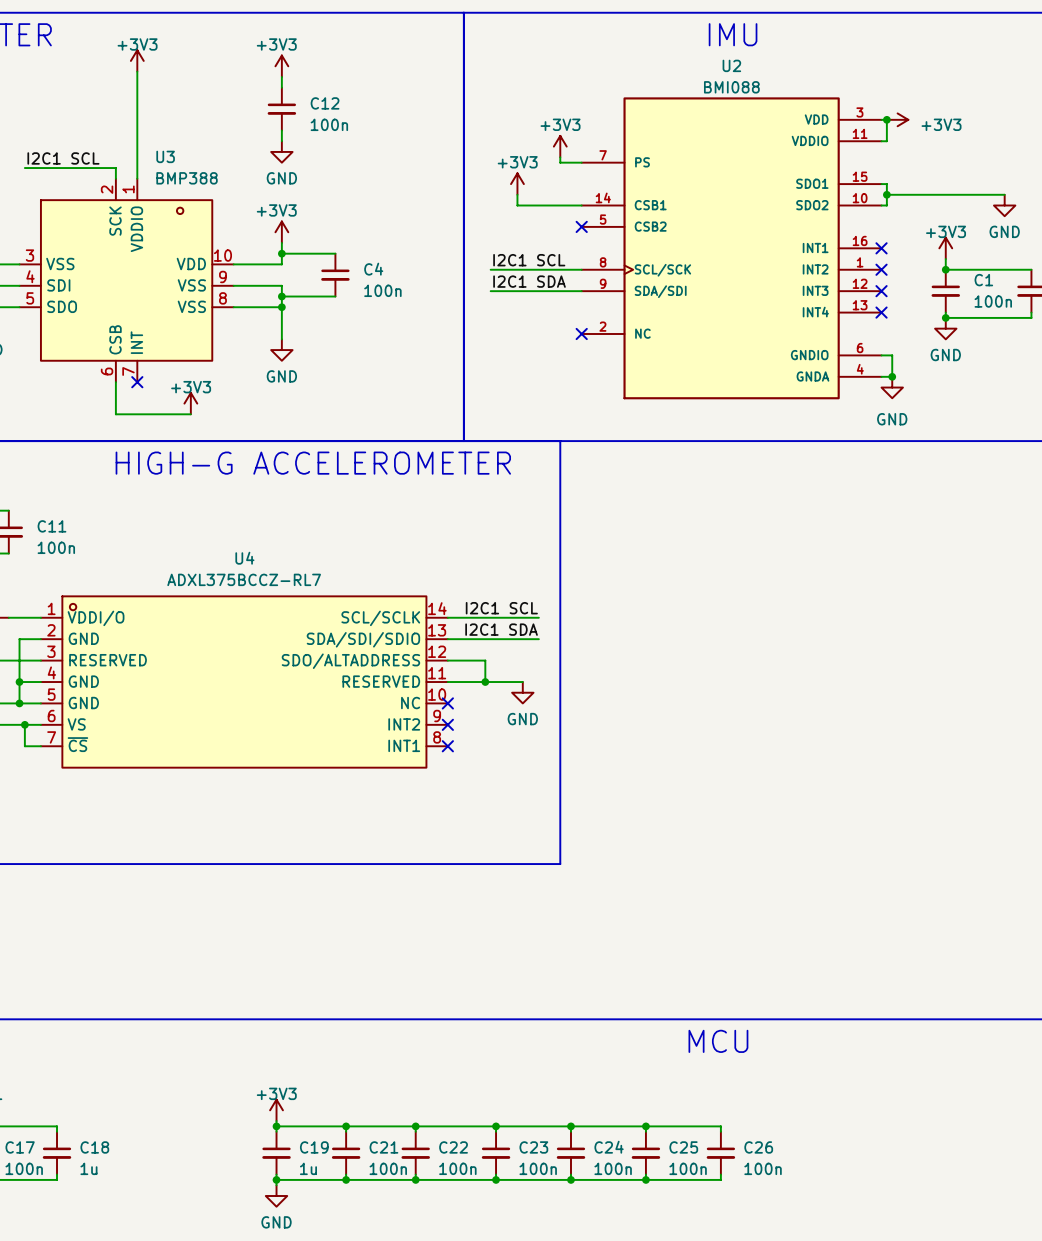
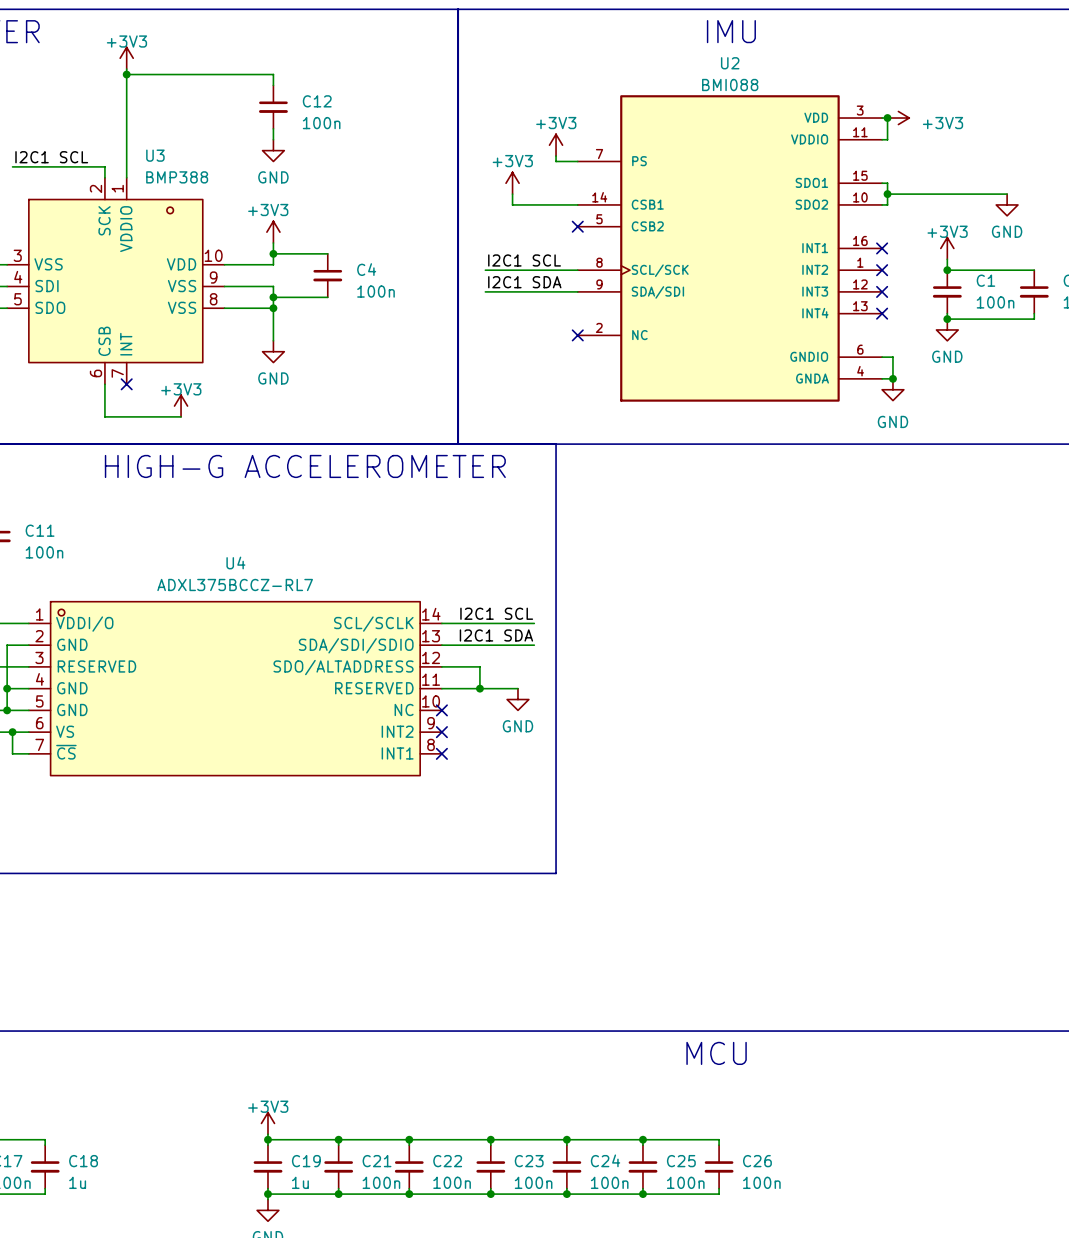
power symbol: +3V3 (281, 66) -> none
wire: none -> (126, 74) (273, 74)
junction: none -> (126, 74)

